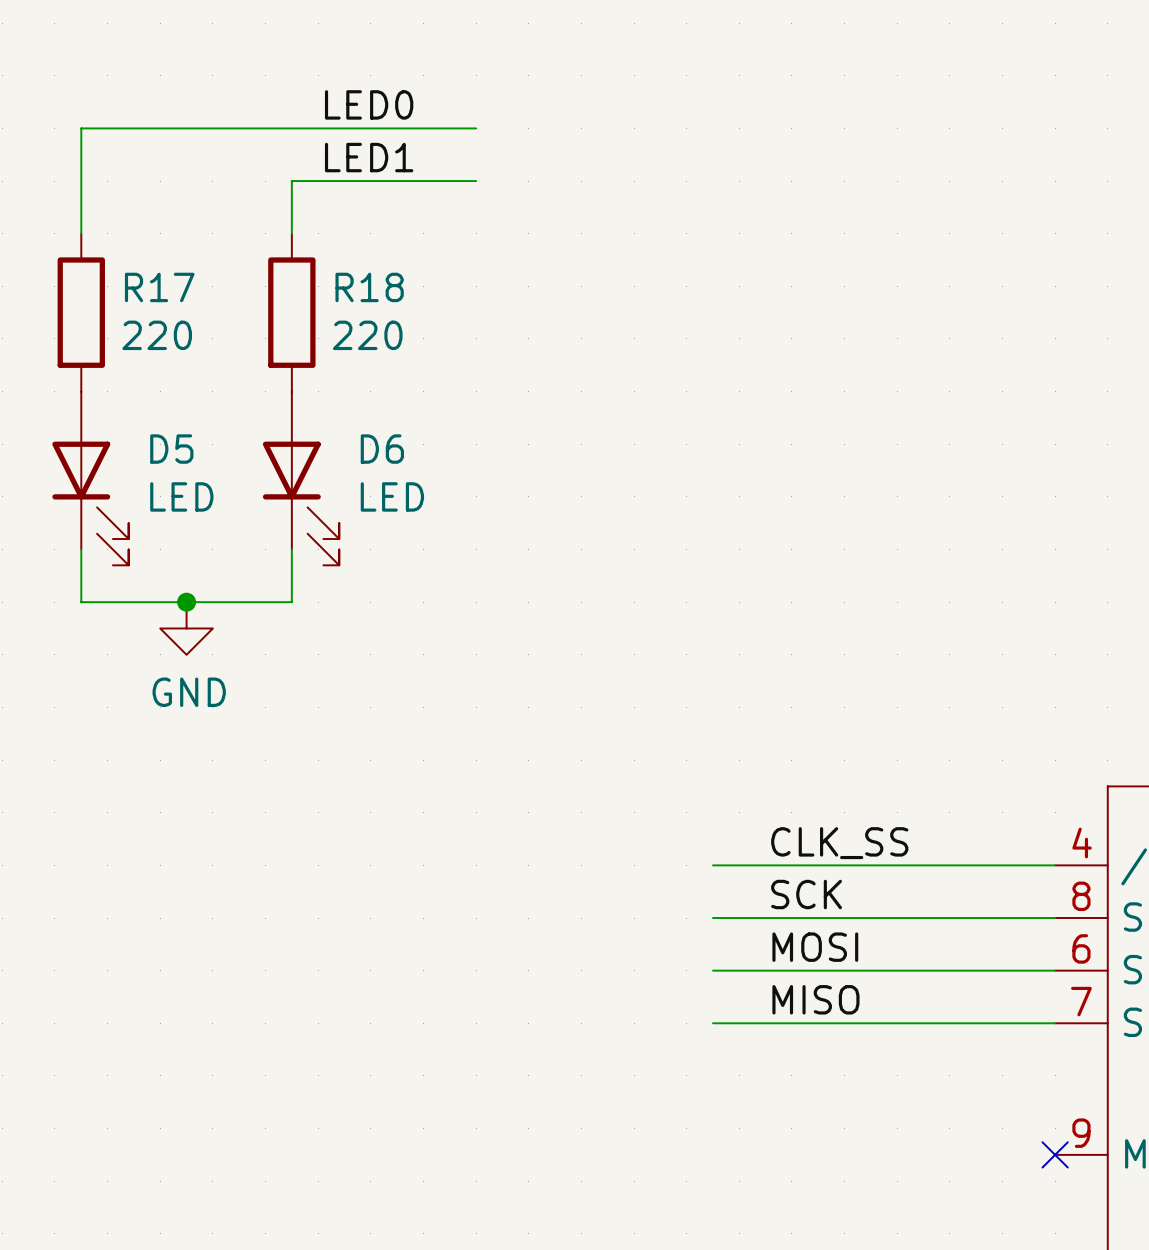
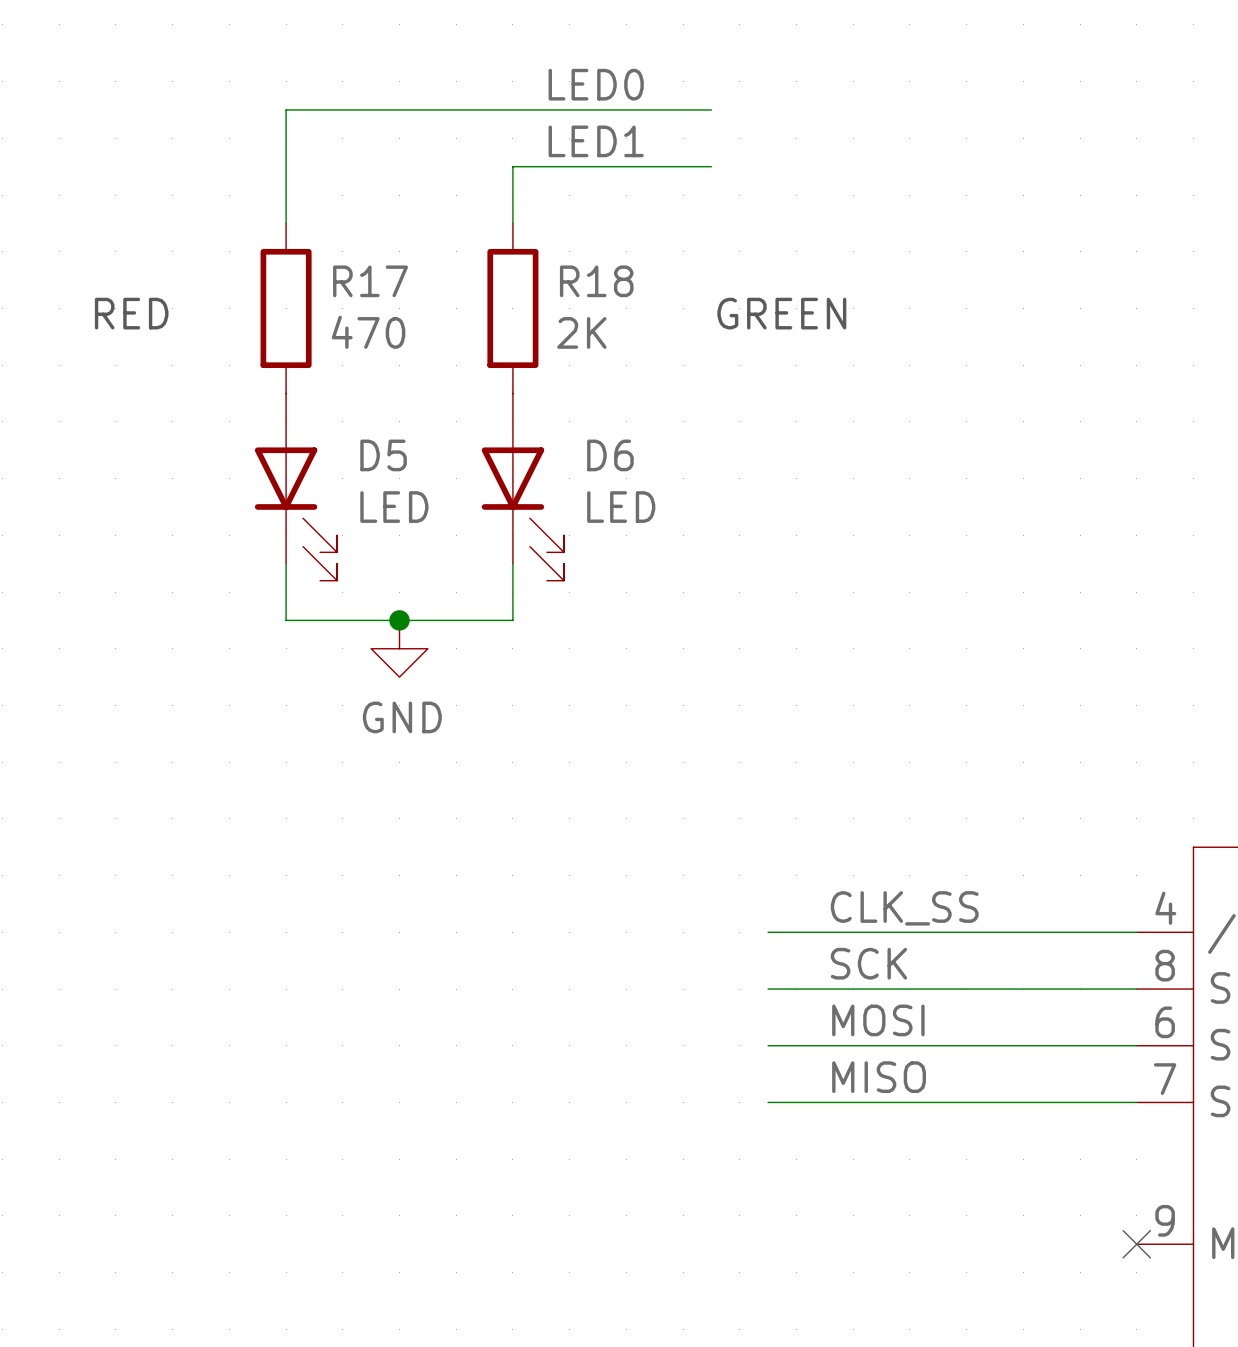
label position: LED0 (369, 104) -> LED0 (596, 84)
wire: (476, 128) (81, 128) (81, 233) -> (711, 109) (286, 109) (286, 223)
label position: LED1 (369, 157) -> LED1 (596, 141)
wire: (476, 181) (291, 181) (291, 233) -> (711, 166) (512, 166) (512, 223)
text: none -> RED (131, 313)
text: none -> GREEN (781, 313)
R17 position: (81, 312) -> (286, 308)
R18 position: (291, 312) -> (512, 308)
R17 value: 220 (157, 335) -> 470 (368, 332)
R18 value: 220 (367, 335) -> 2K (581, 332)
D5 position: (90, 478) -> (296, 487)
D6 position: (301, 478) -> (522, 487)
wire: (81, 549) (81, 602) (291, 602) (291, 549) -> (286, 563) (286, 620) (512, 620) (512, 563)
junction: none -> (399, 620)
junction: (186, 602) -> none
power symbol position: GND (186, 628) -> GND (399, 648)

